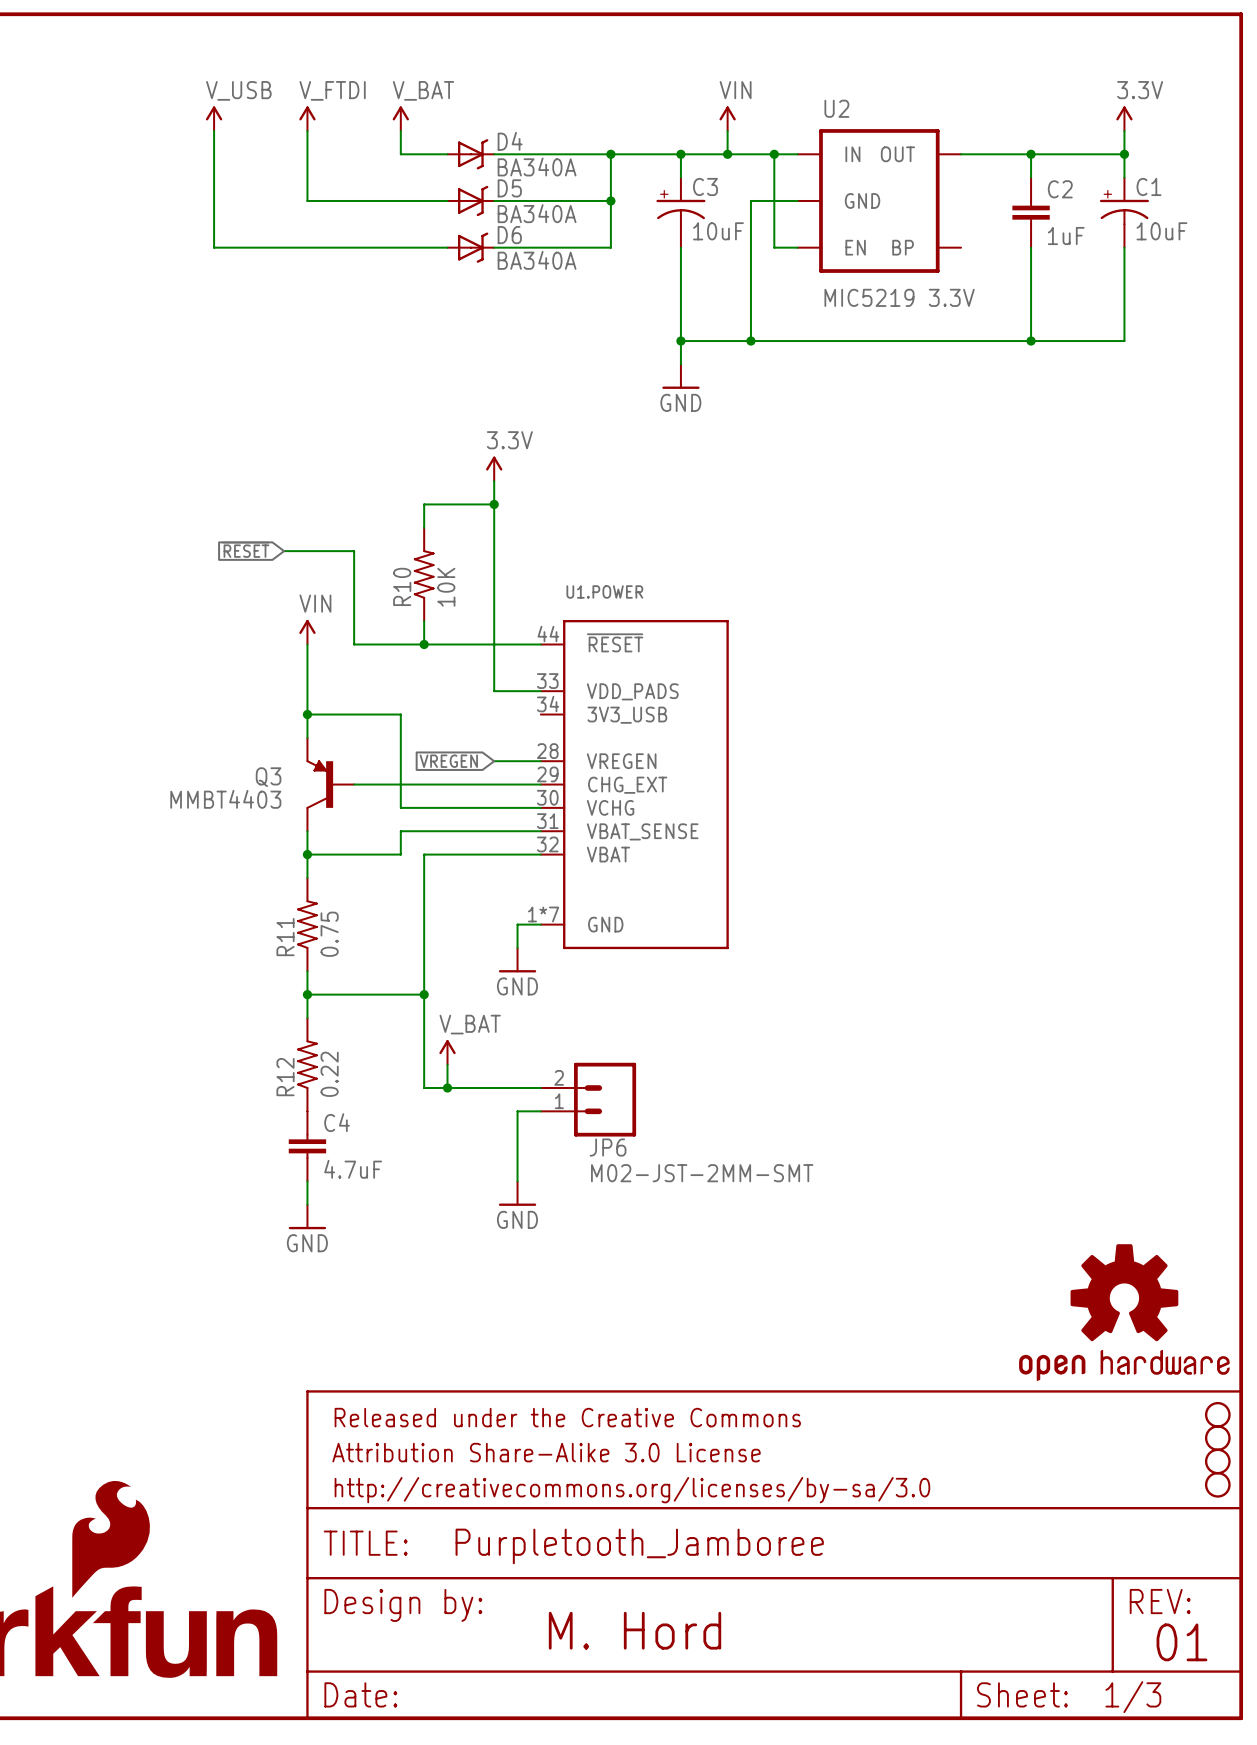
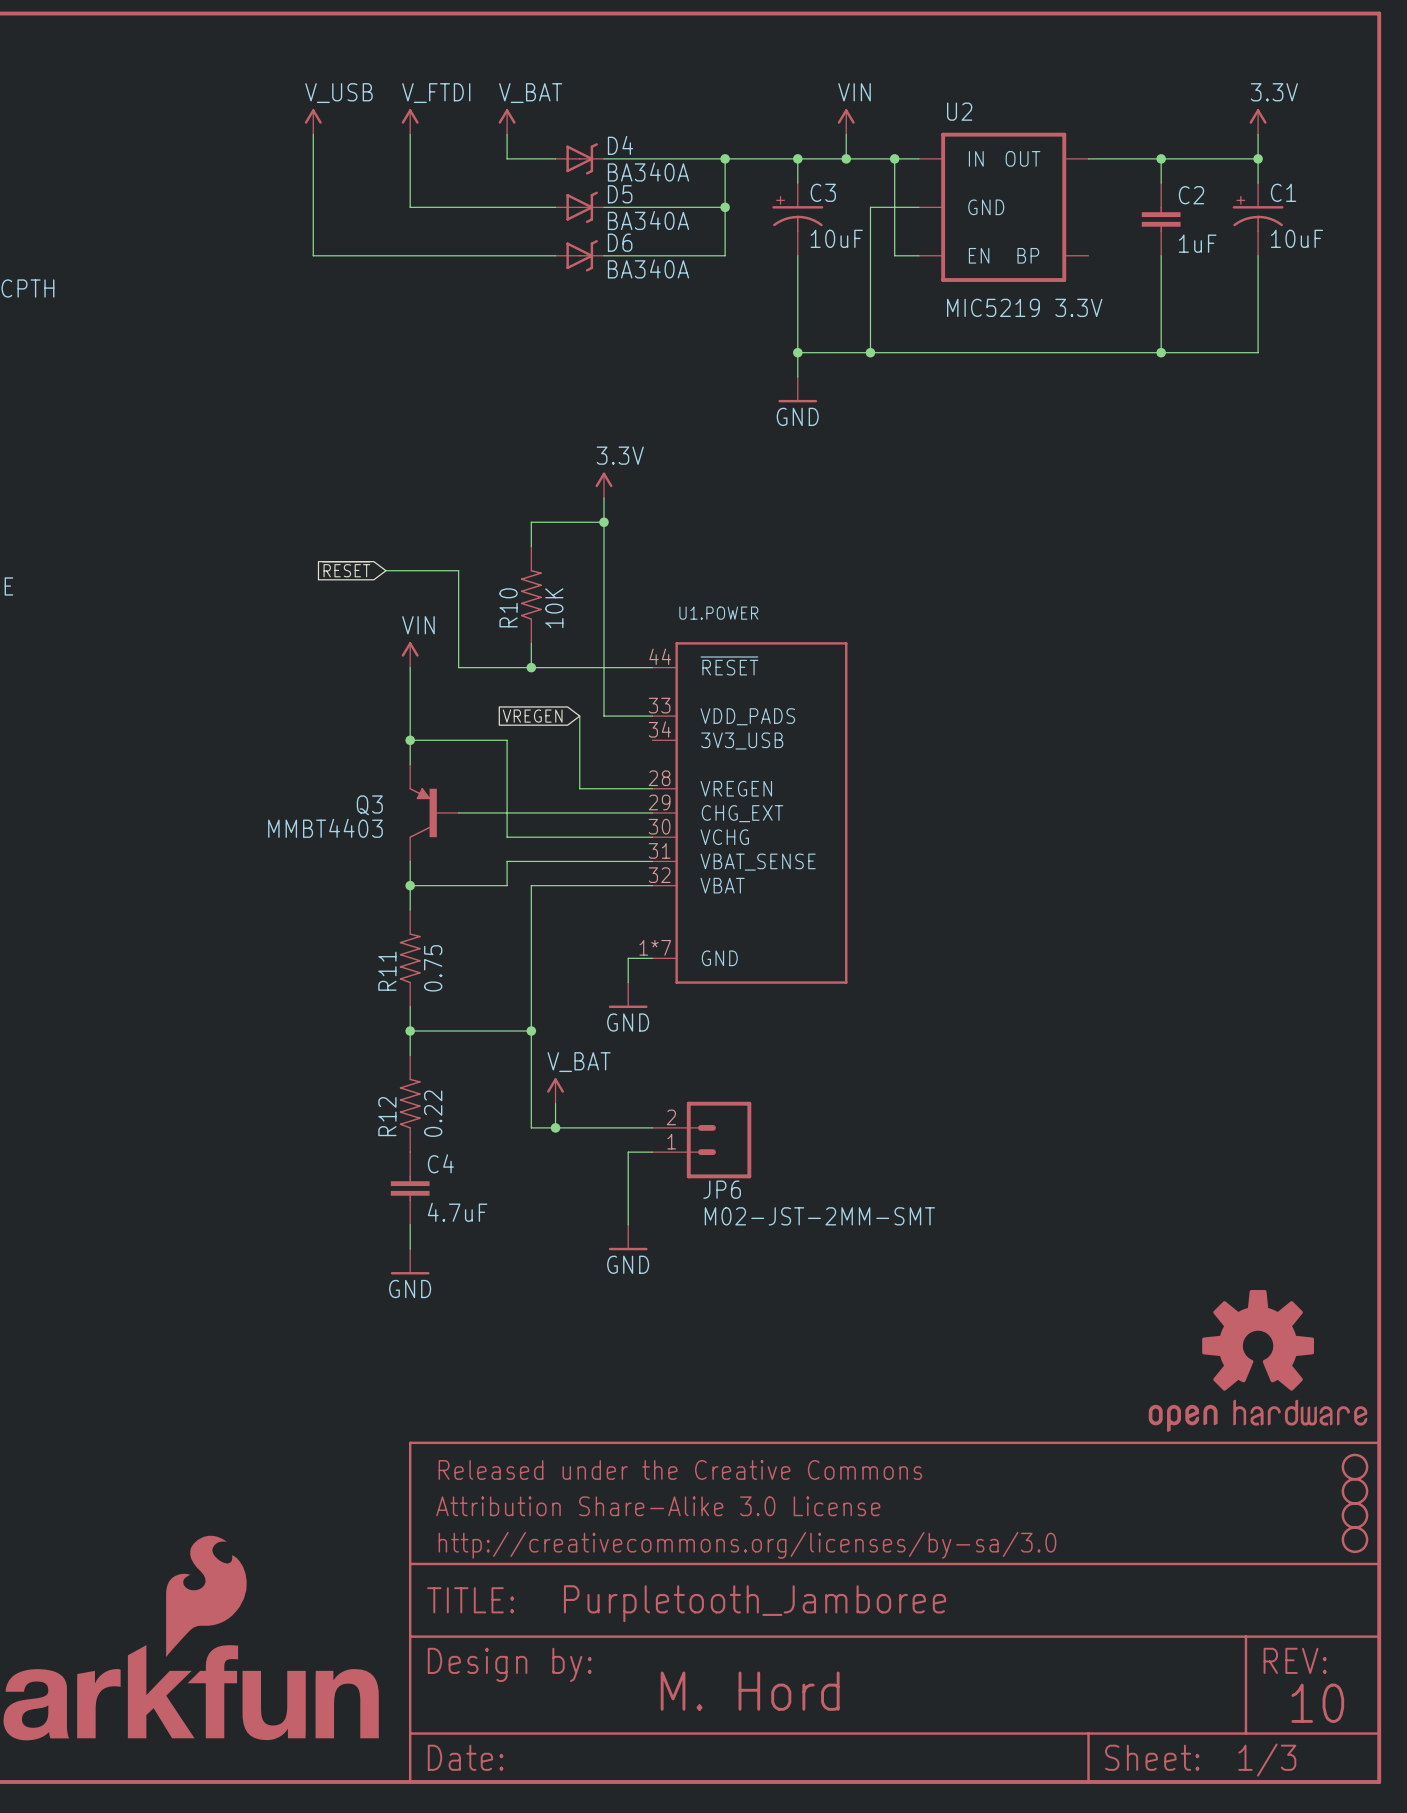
wire: none -> (579, 716) (579, 788) (603, 788)
global label position: VREGEN (448, 761) -> VREGEN (532, 716)
text: 01 (1181, 1642) -> 10 (1317, 1703)

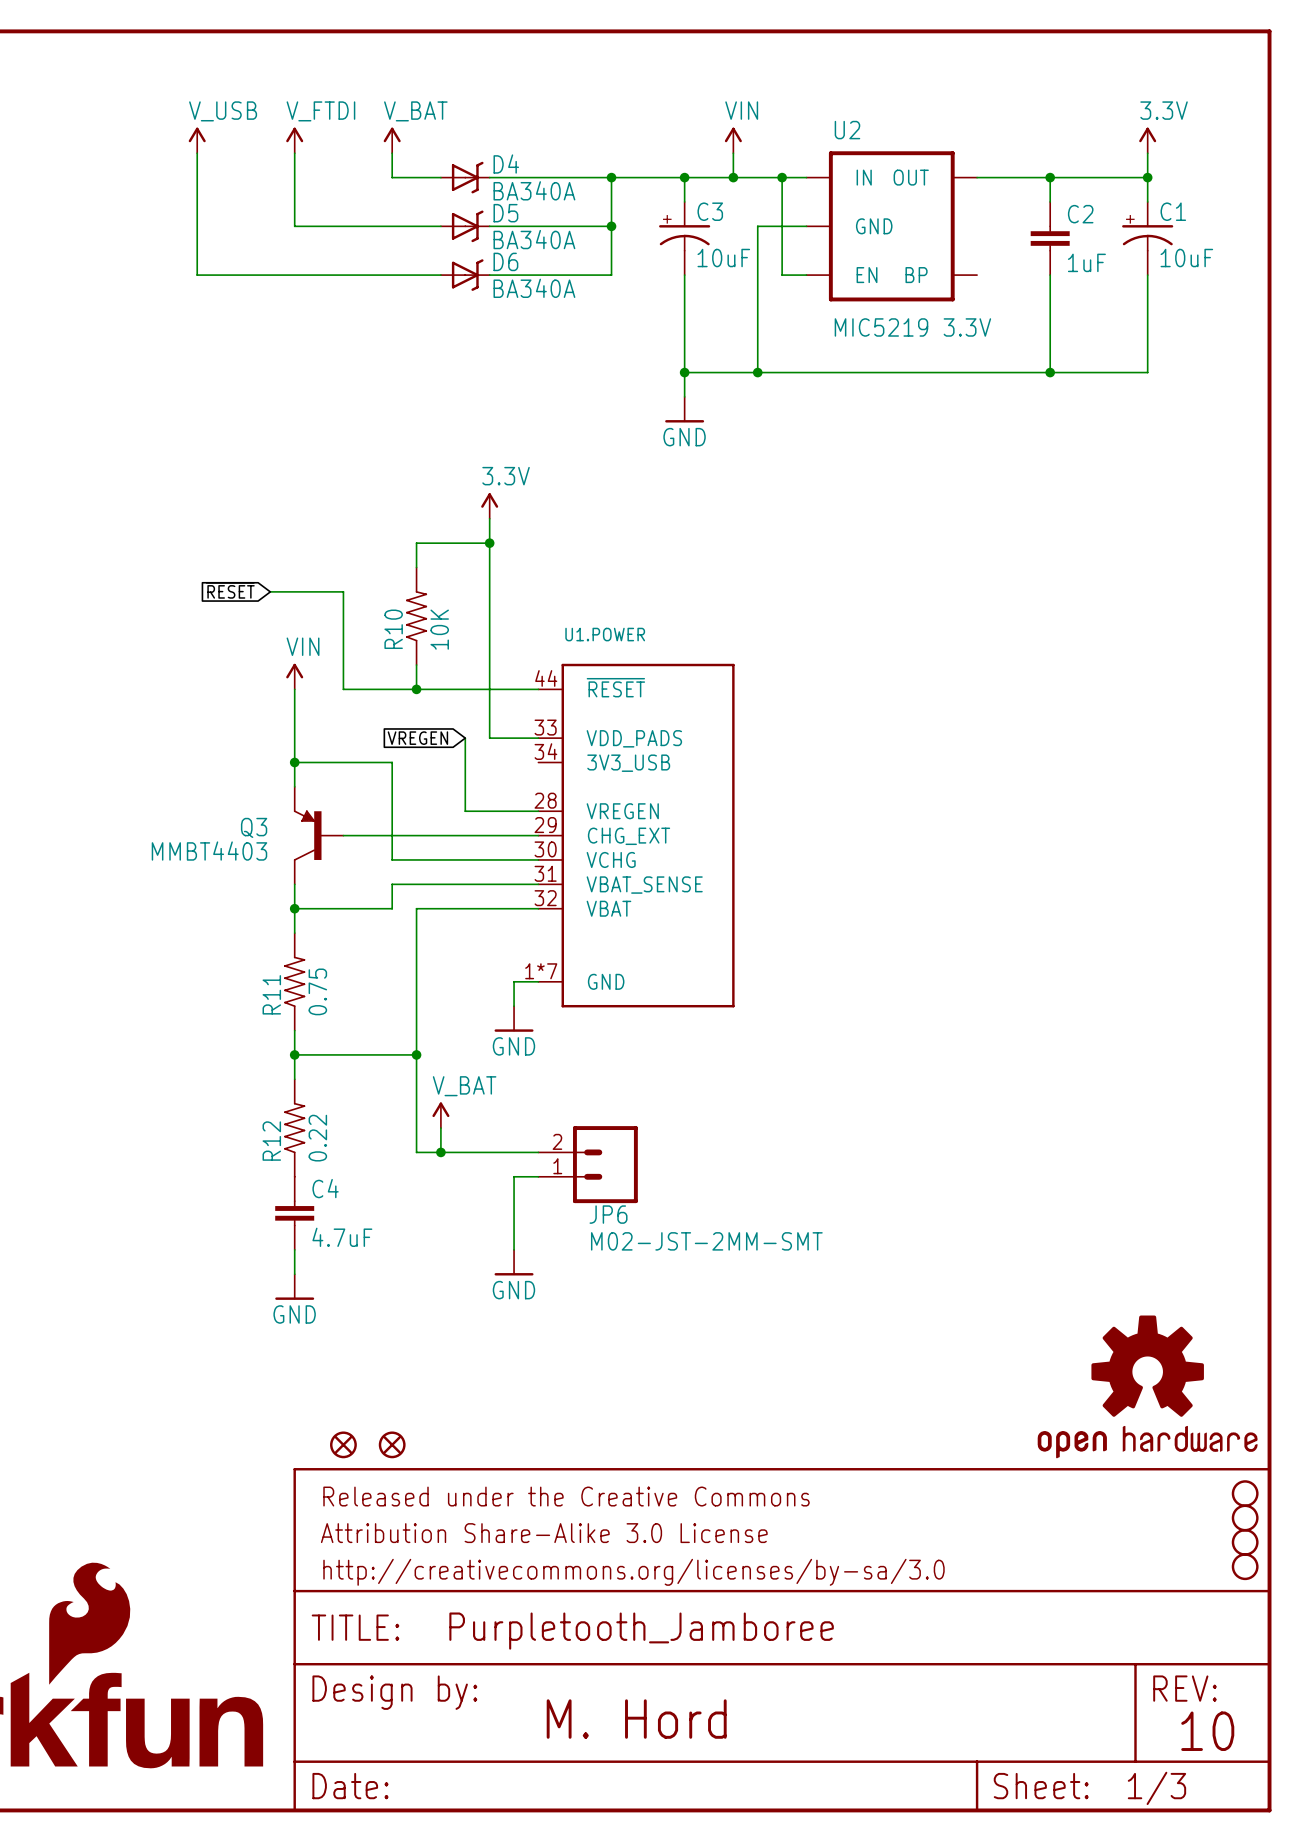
part: none -> (343, 1444)
part: none -> (392, 1444)

